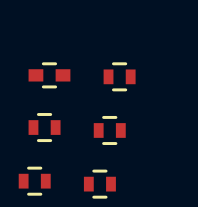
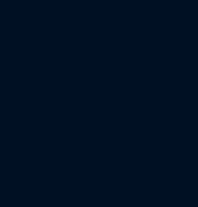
part: (49, 75) -> none
part: (119, 76) -> none
part: (44, 127) -> none
part: (109, 130) -> none
part: (34, 181) -> none
part: (99, 184) -> none

